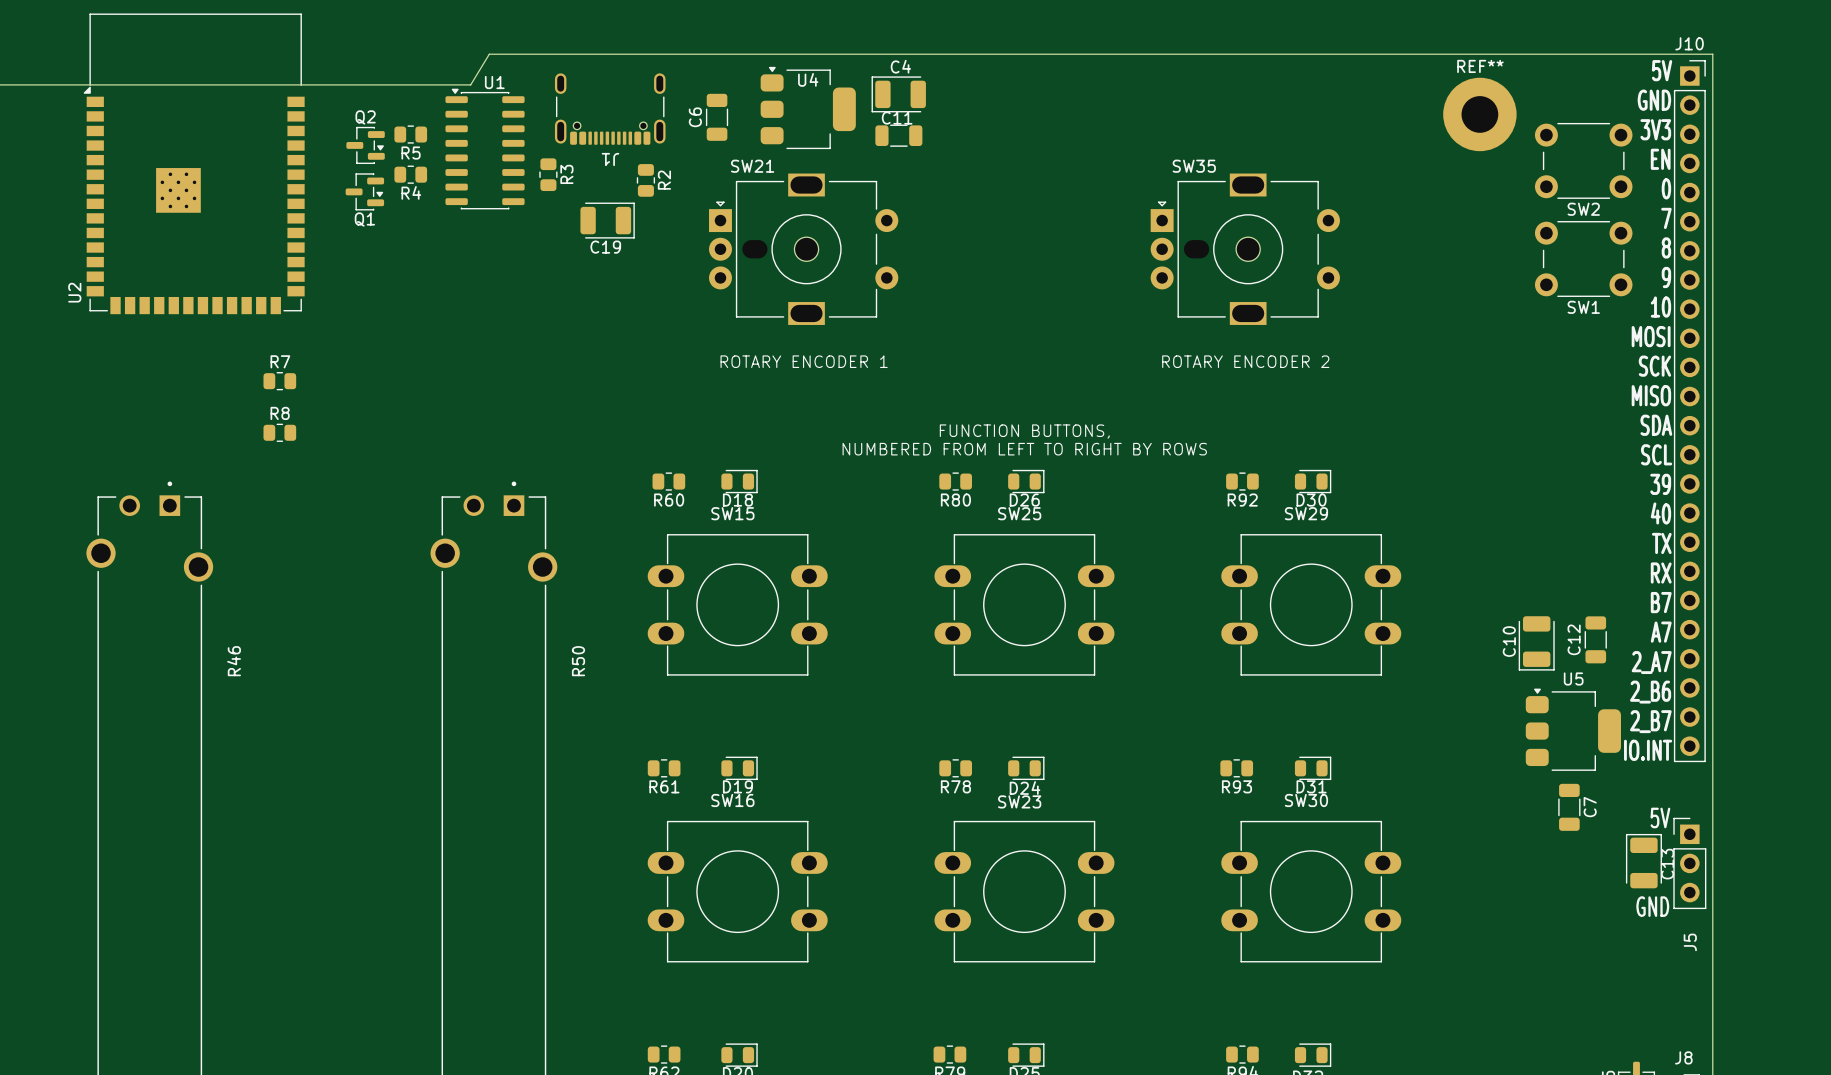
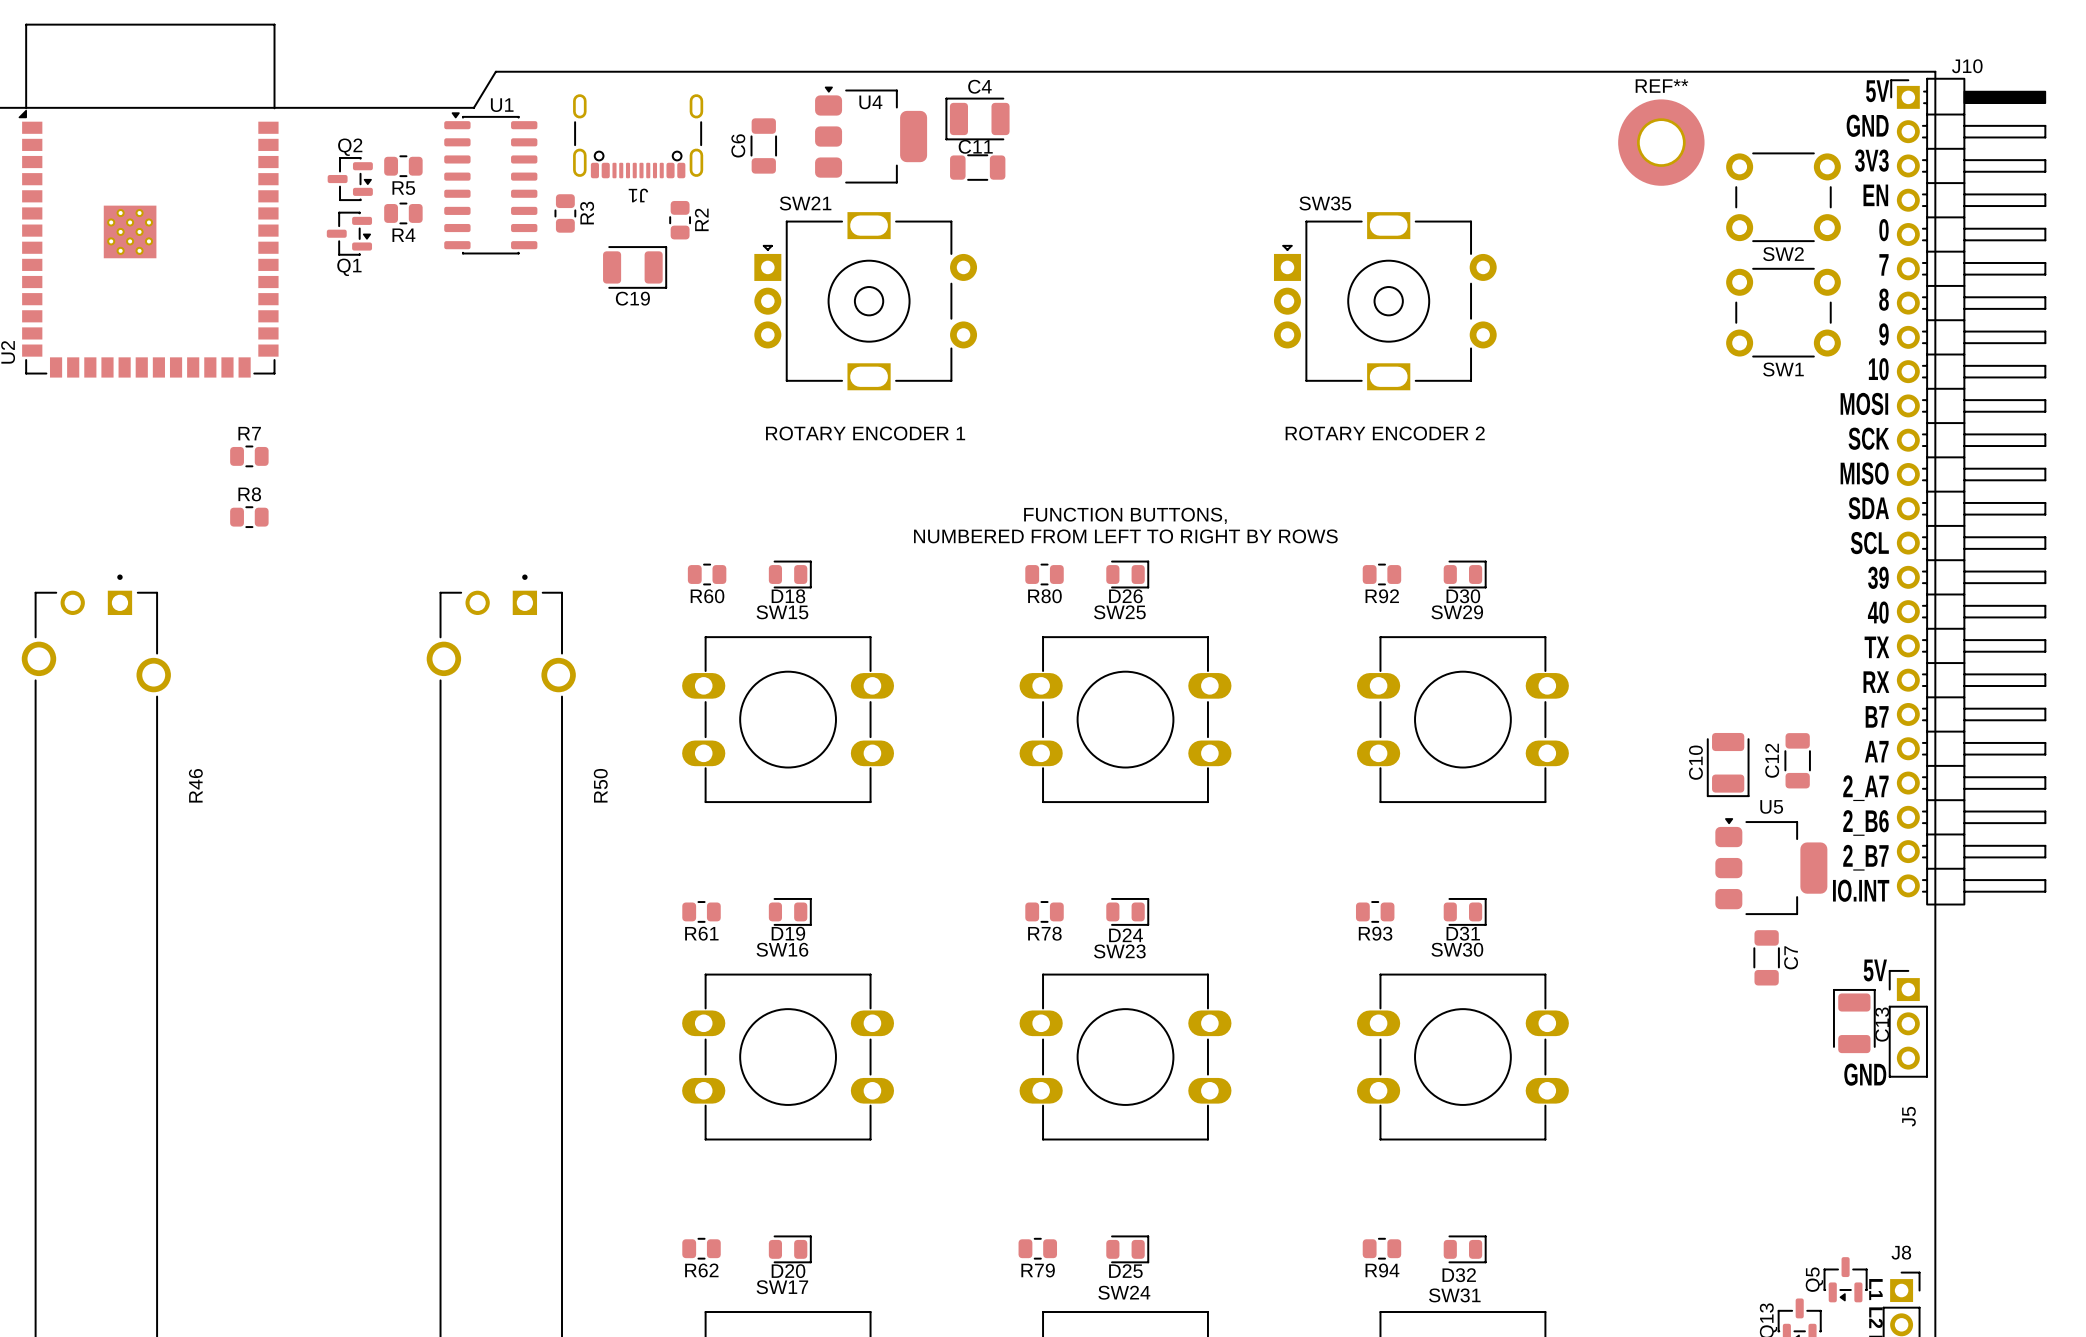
J10 footprint: [1673, 60, 1706, 763] -> [1890, 77, 2047, 906]

